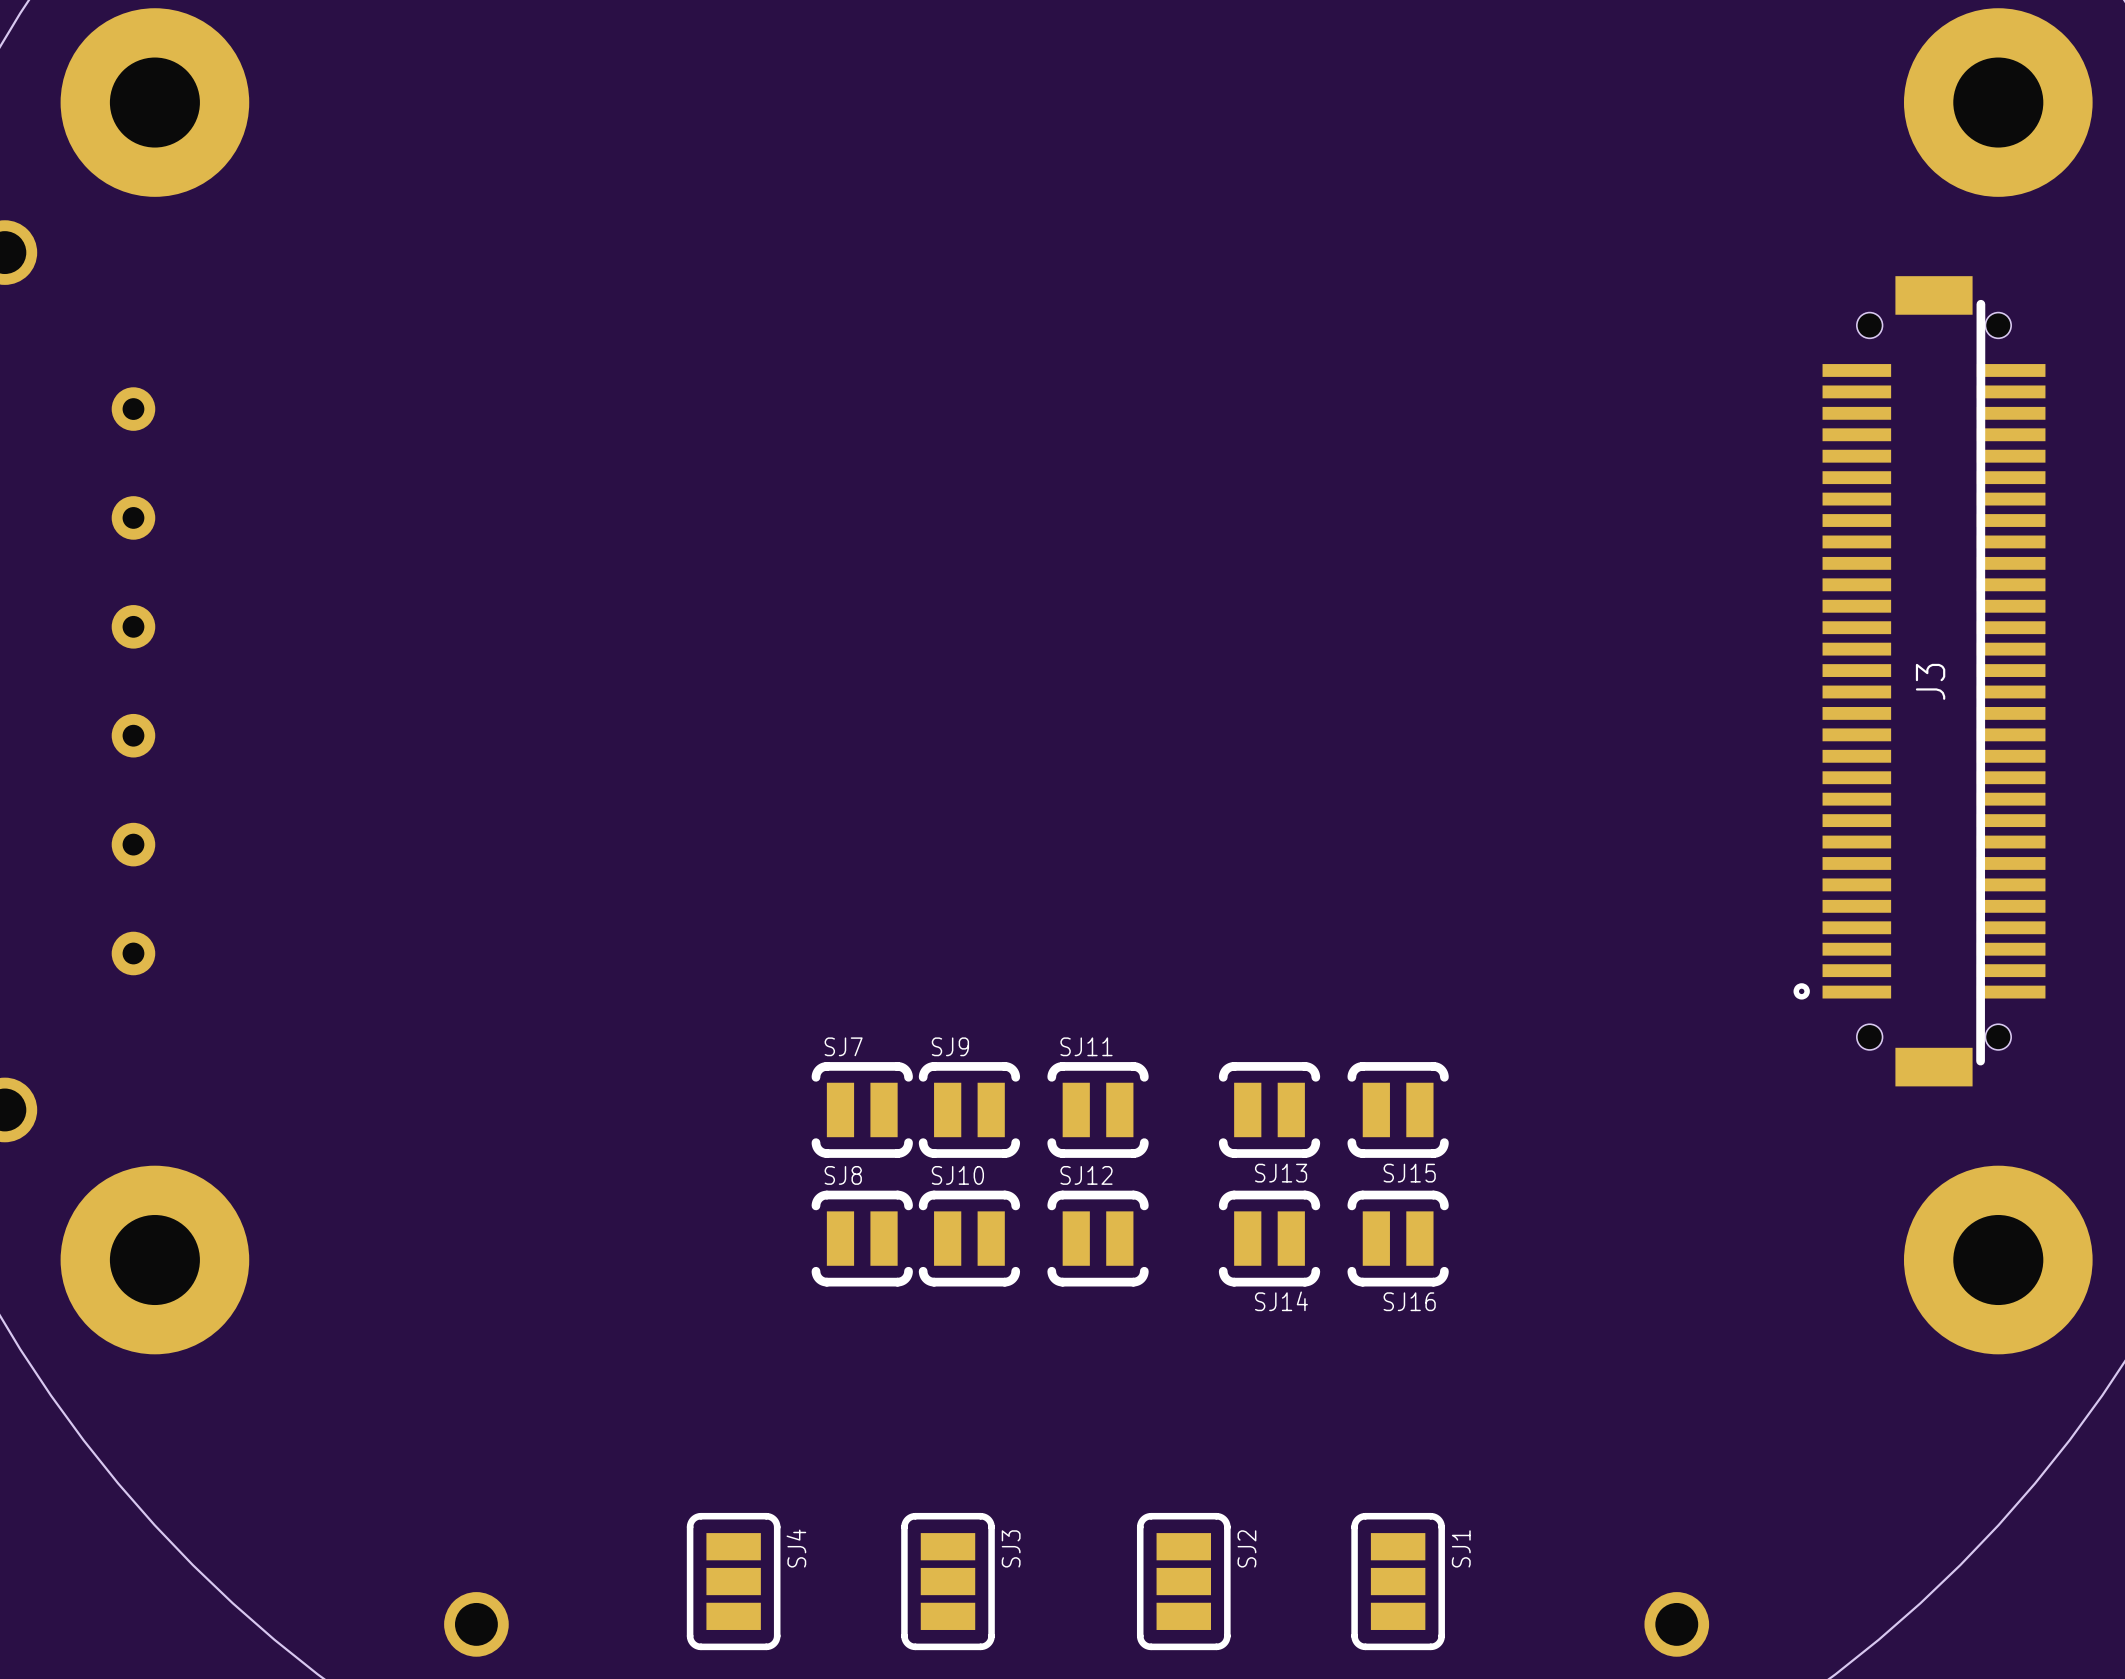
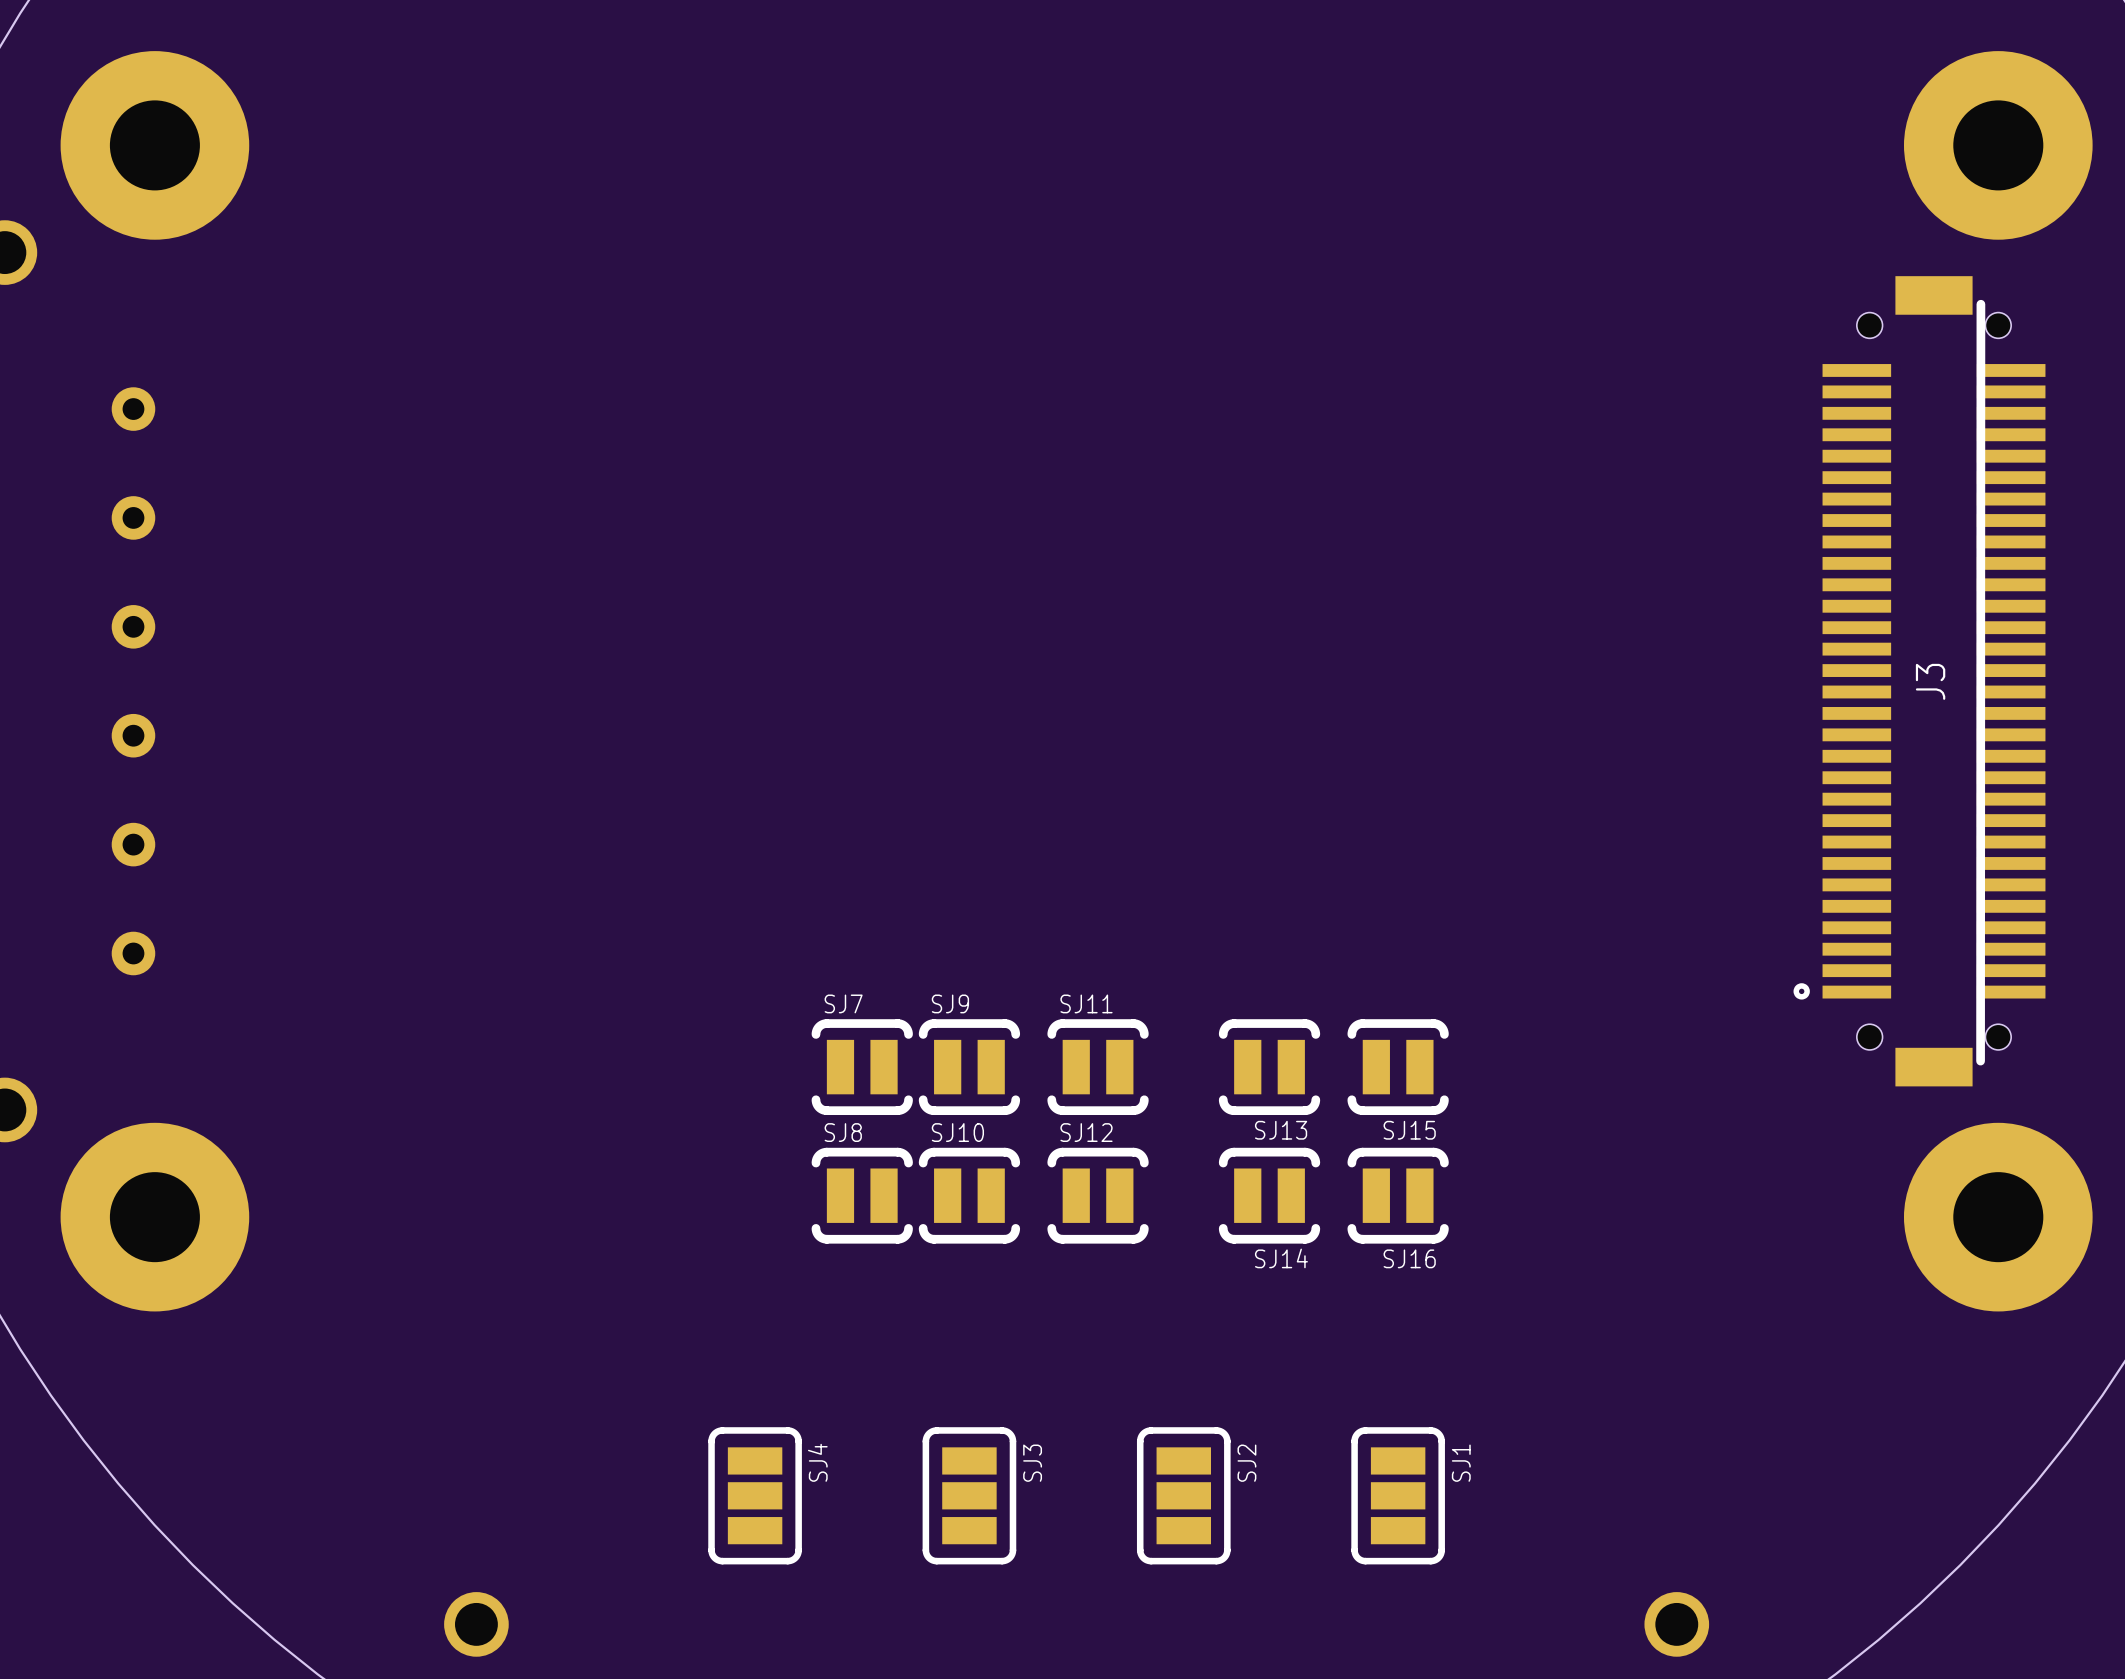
part position: (154, 102) -> (154, 145)
part position: (1998, 102) -> (1998, 145)
SJ7 position: (862, 1109) -> (862, 1067)
SJ9 position: (969, 1109) -> (969, 1067)
SJ11 position: (1098, 1109) -> (1098, 1067)
SJ13 position: (1269, 1109) -> (1269, 1067)
SJ15 position: (1398, 1109) -> (1398, 1067)
SJ8 position: (862, 1238) -> (862, 1195)
SJ10 position: (969, 1238) -> (969, 1195)
SJ12 position: (1098, 1238) -> (1098, 1195)
SJ14 position: (1269, 1238) -> (1269, 1195)
SJ16 position: (1398, 1238) -> (1398, 1195)
part position: (154, 1260) -> (154, 1217)
part position: (1998, 1260) -> (1998, 1217)
SJ4 position: (733, 1581) -> (755, 1495)
SJ3 position: (947, 1581) -> (969, 1495)
SJ2 position: (1183, 1581) -> (1183, 1495)
SJ1 position: (1398, 1581) -> (1398, 1495)

